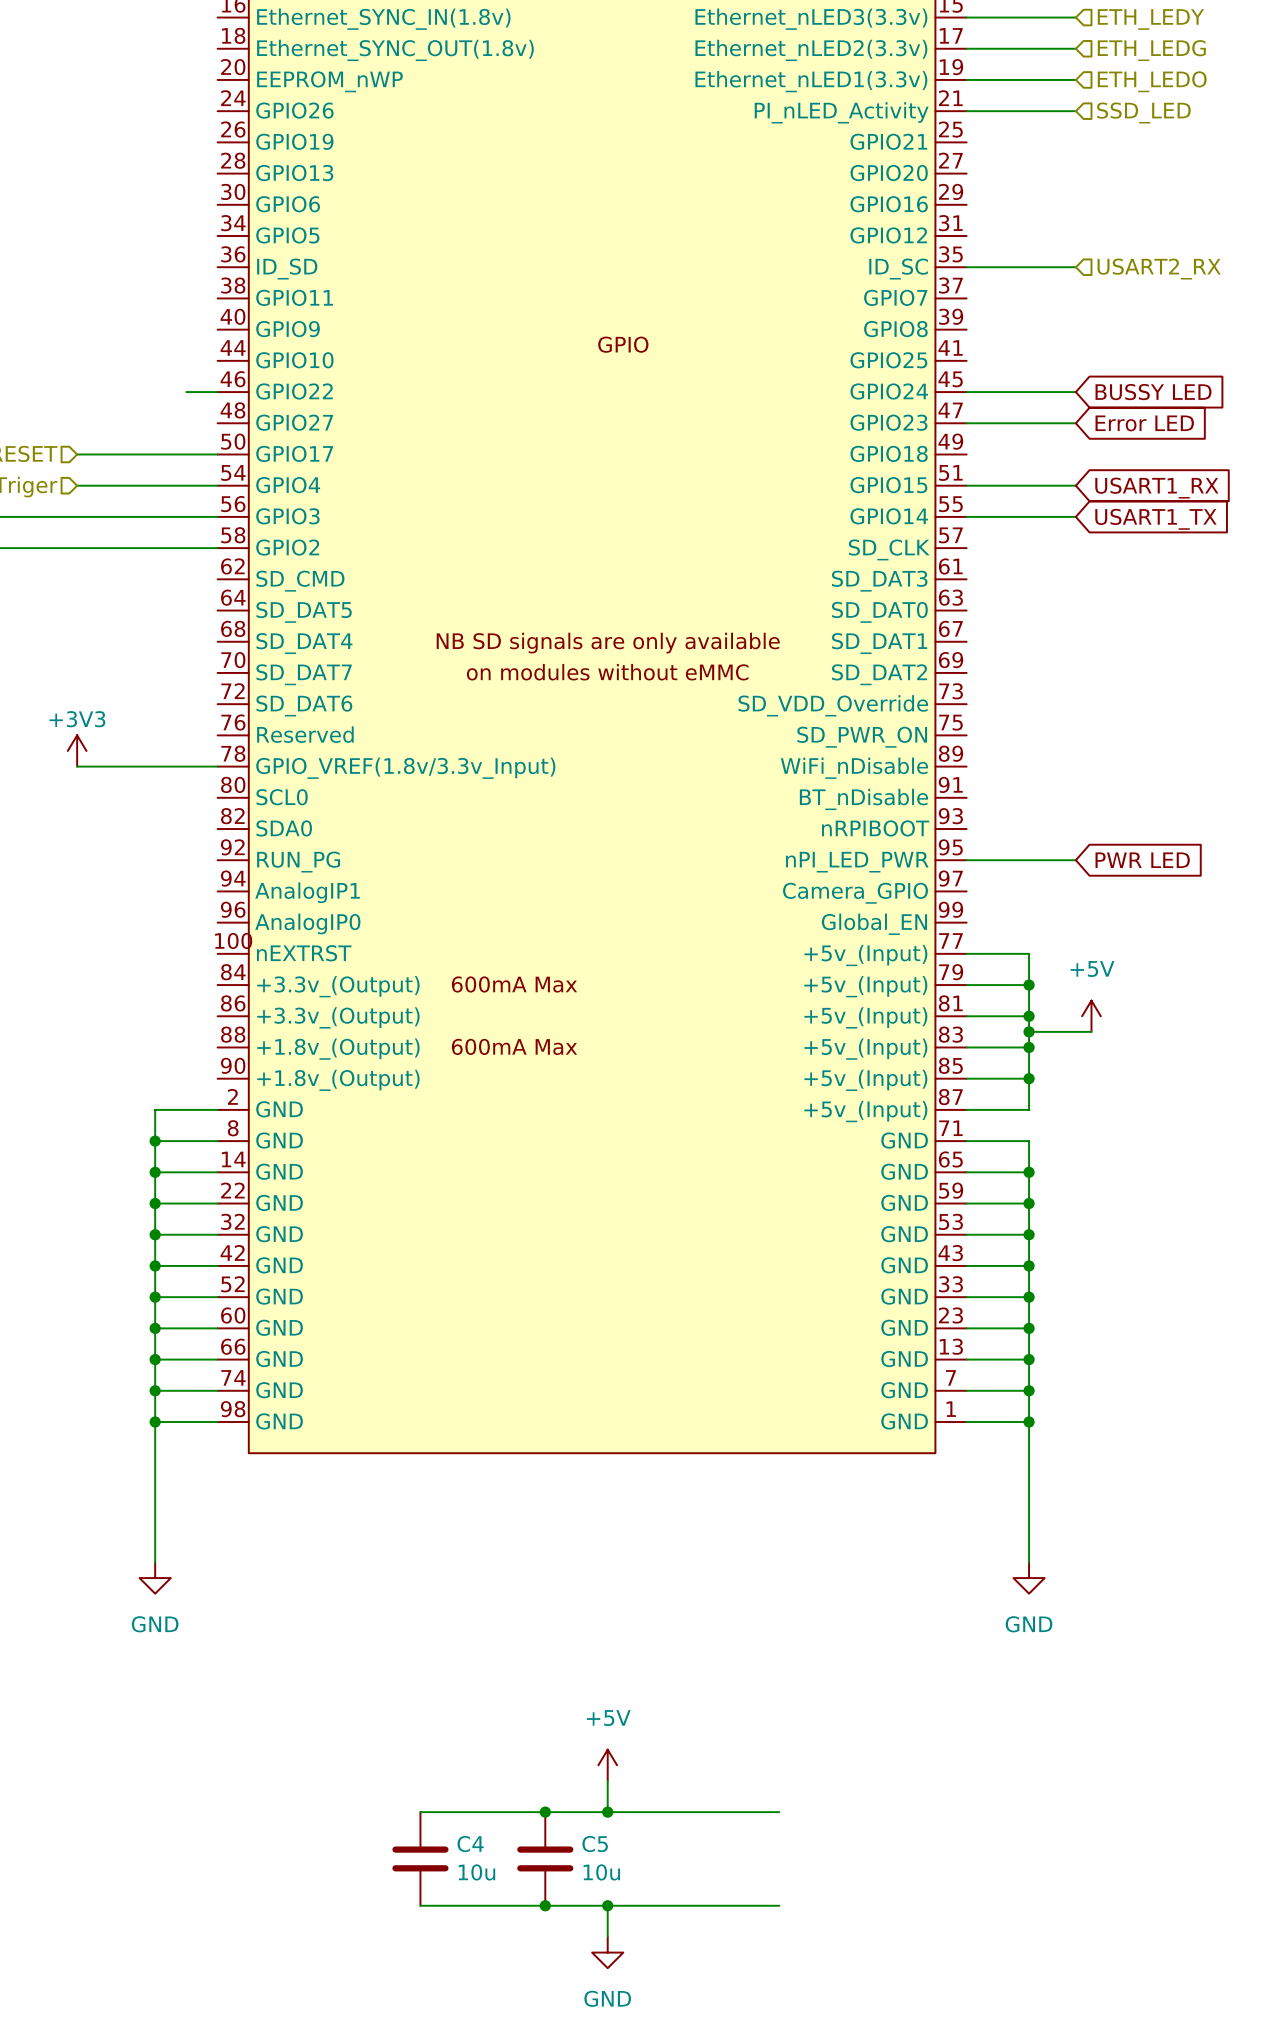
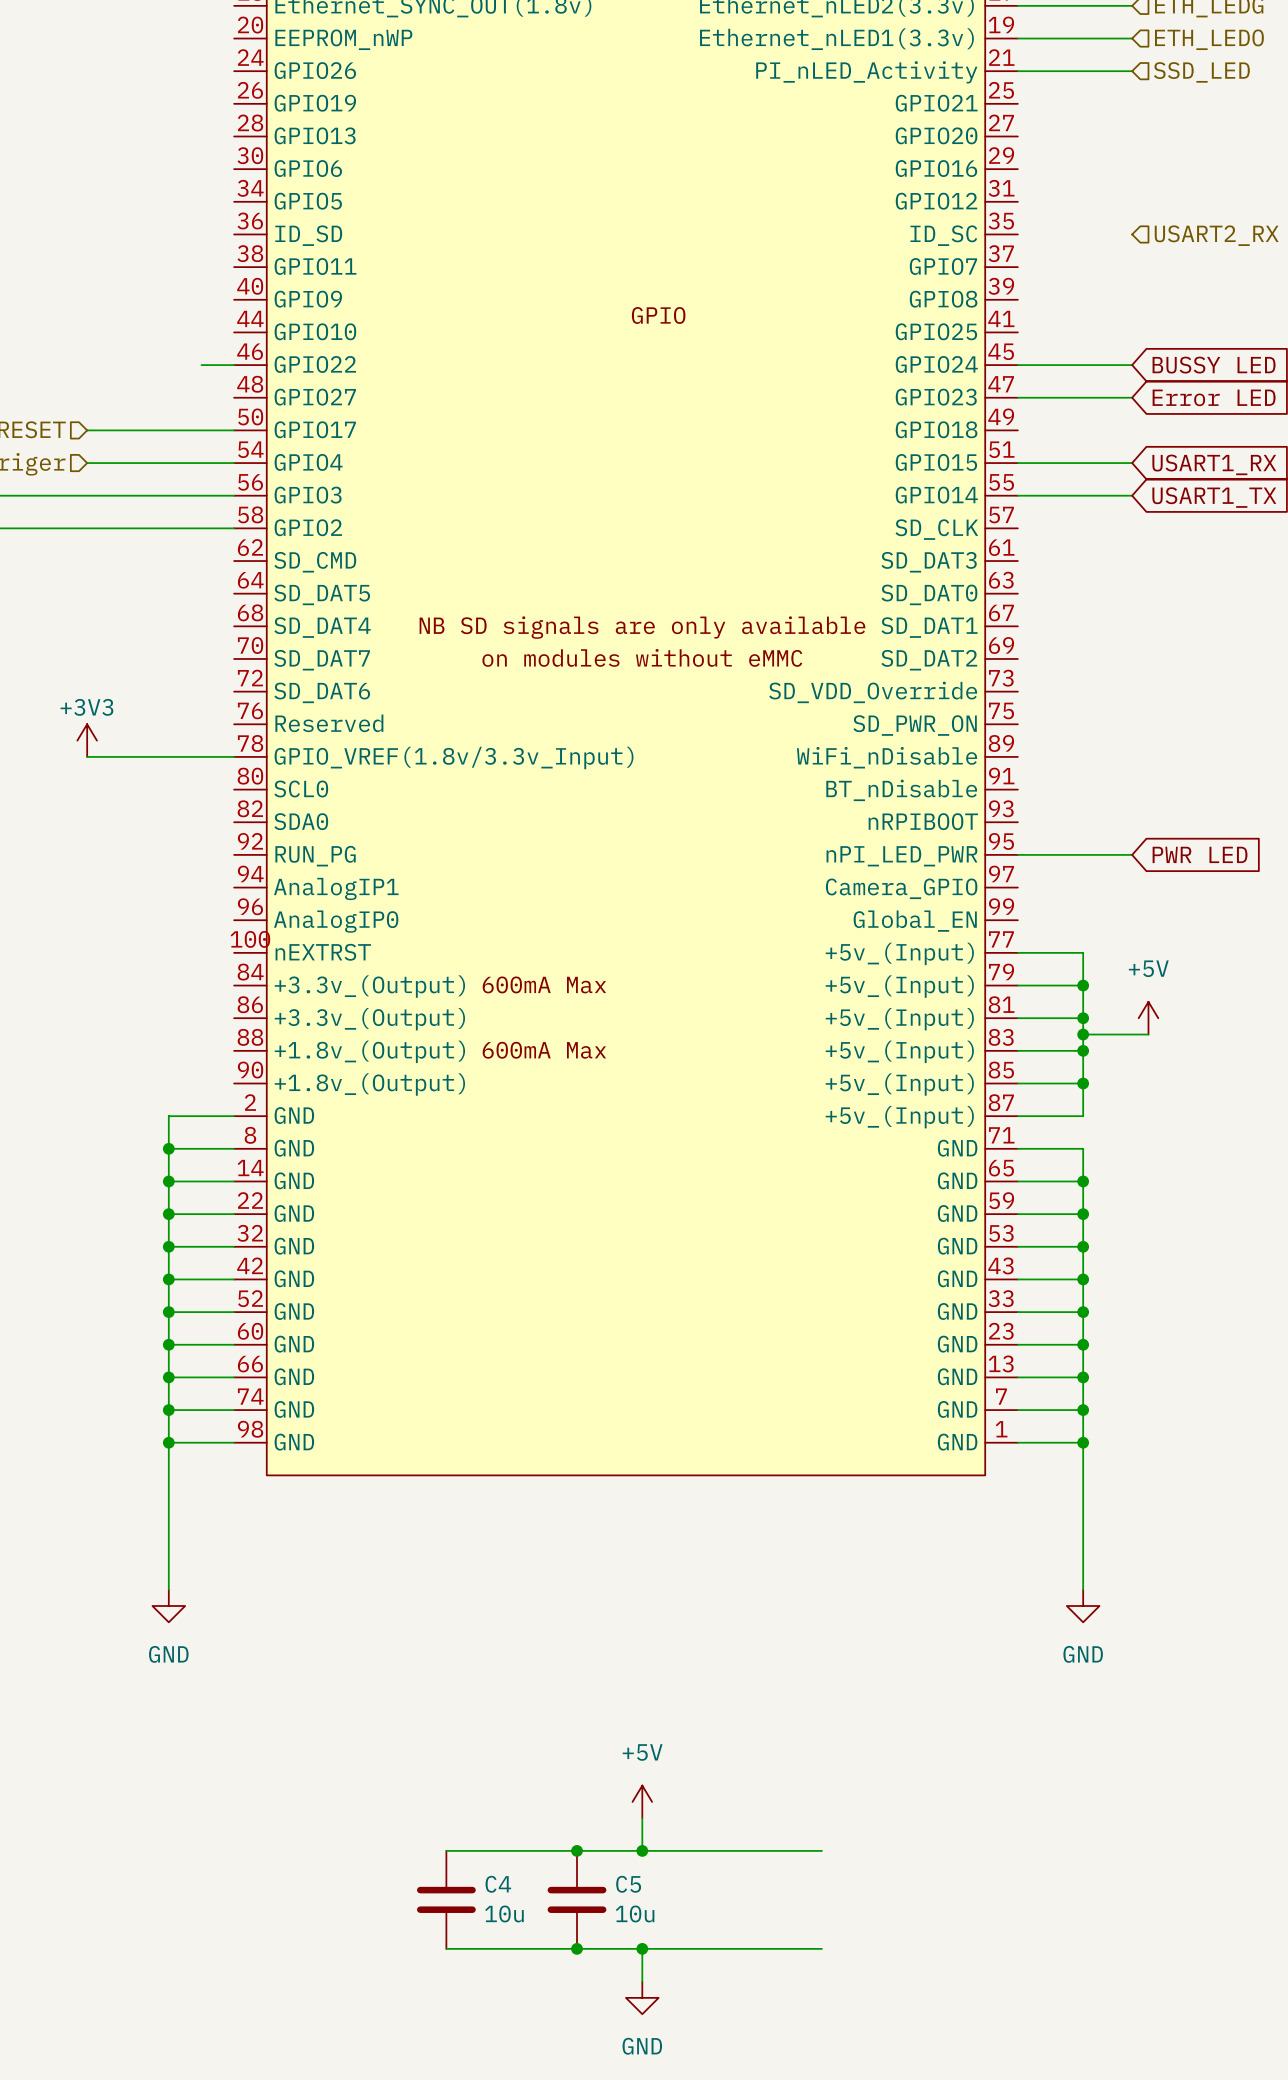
wire: (966, 267) (1075, 267) -> none

